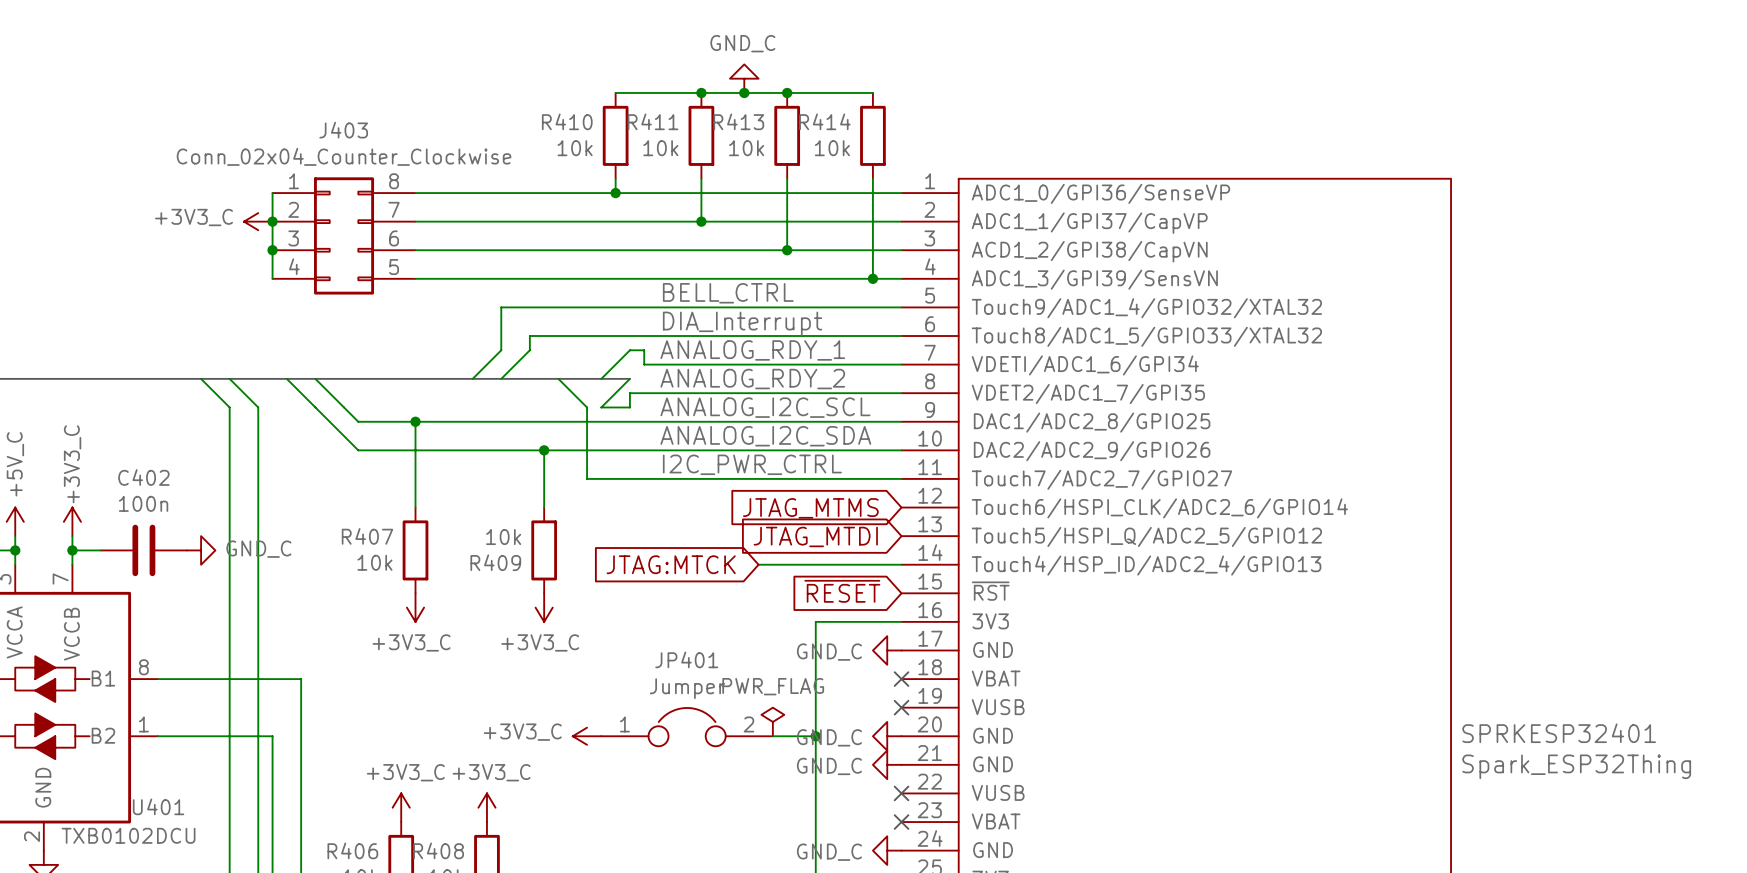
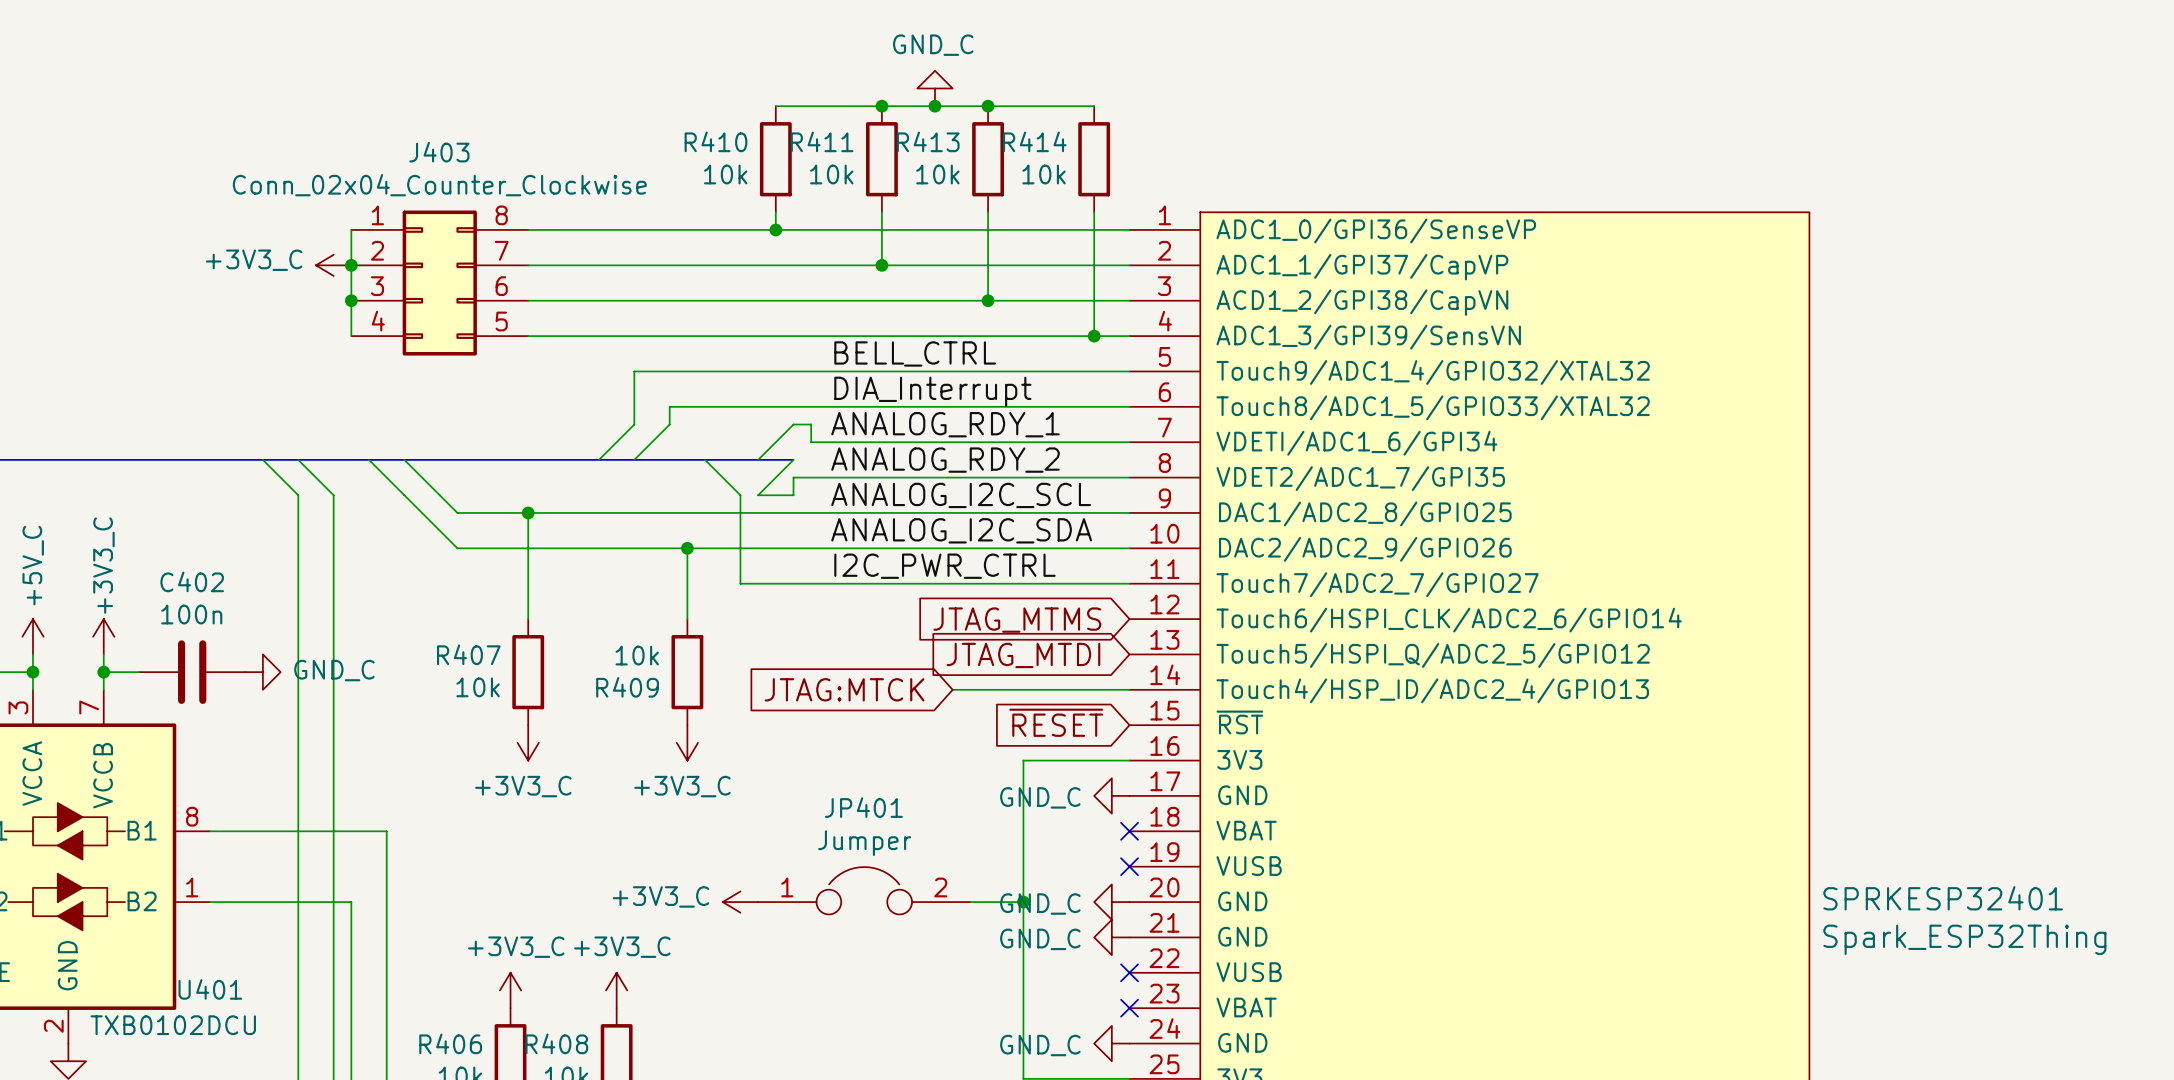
power symbol: PWR_FLAG (772, 721) -> none

